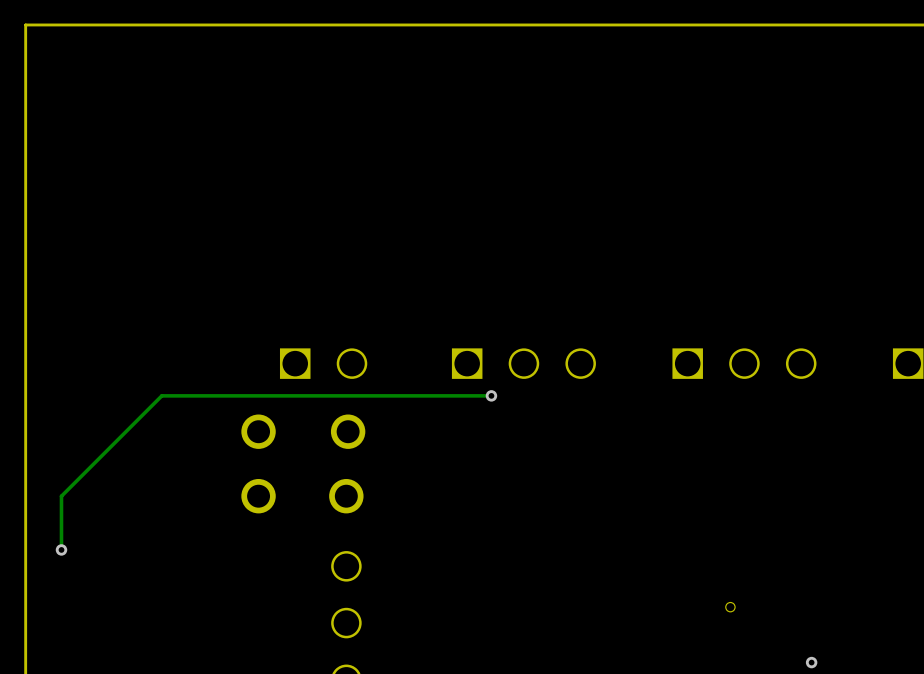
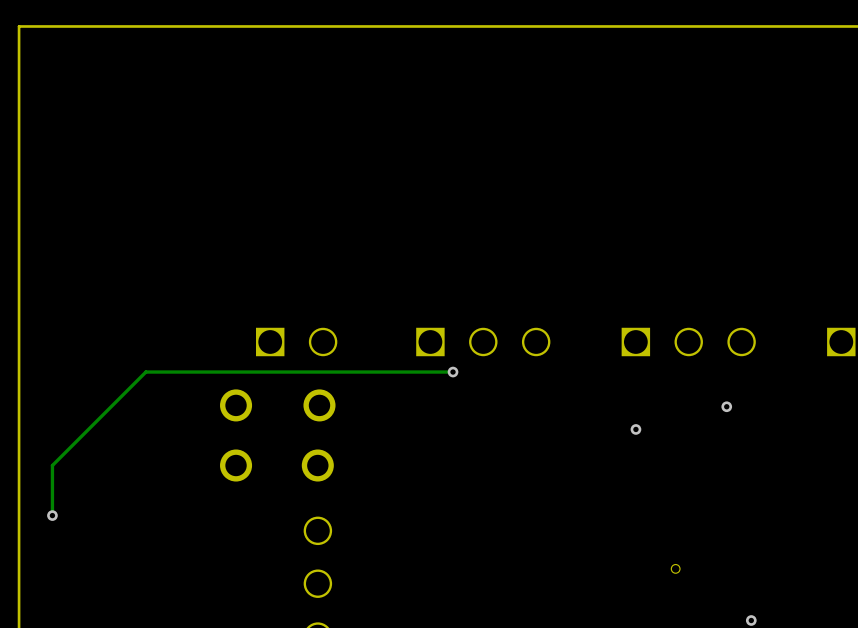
via: none -> (726, 406)
via: none -> (635, 429)

